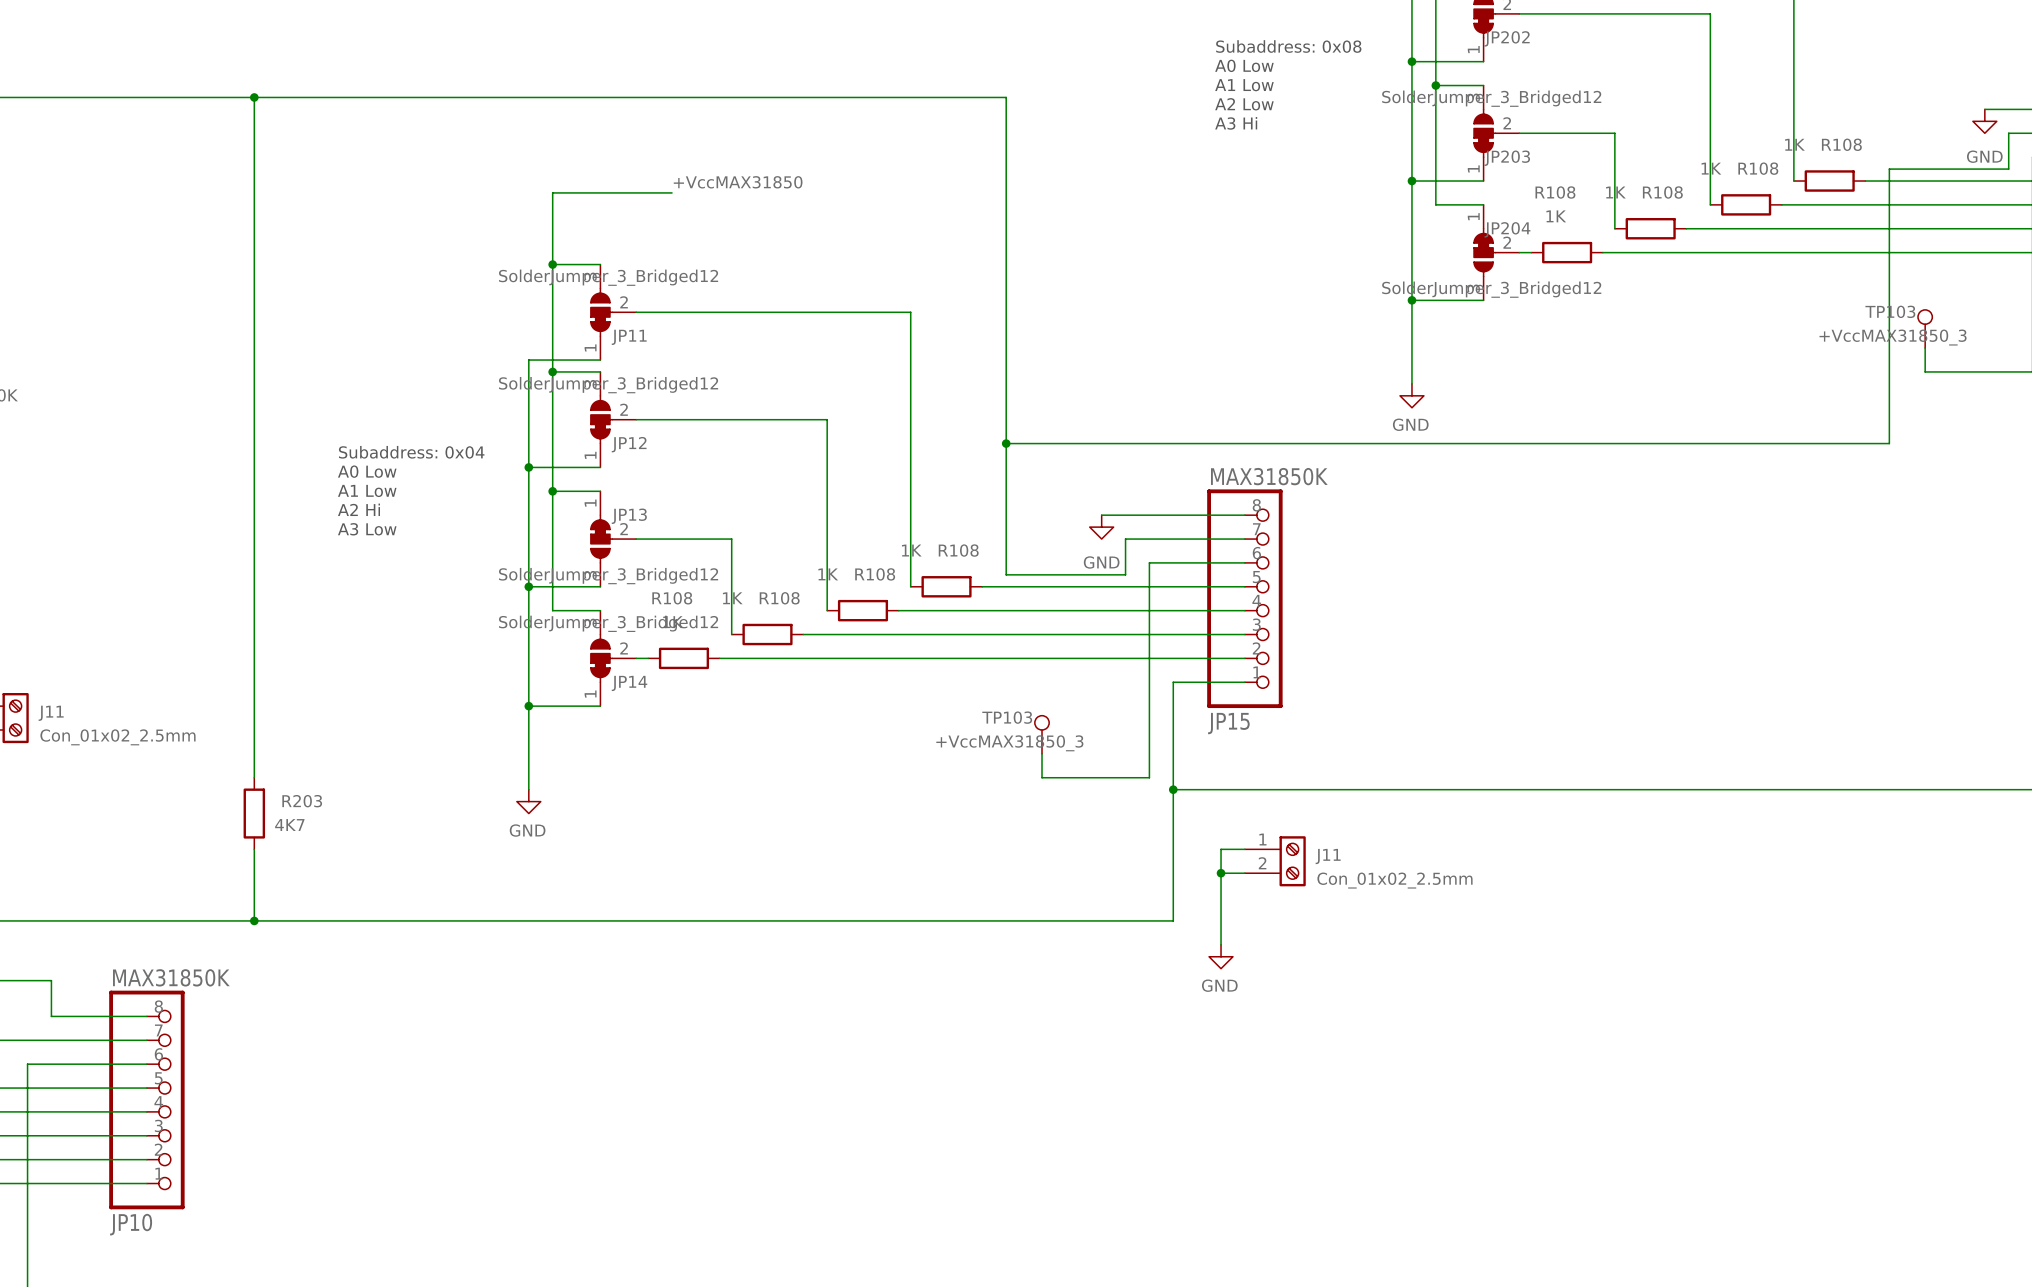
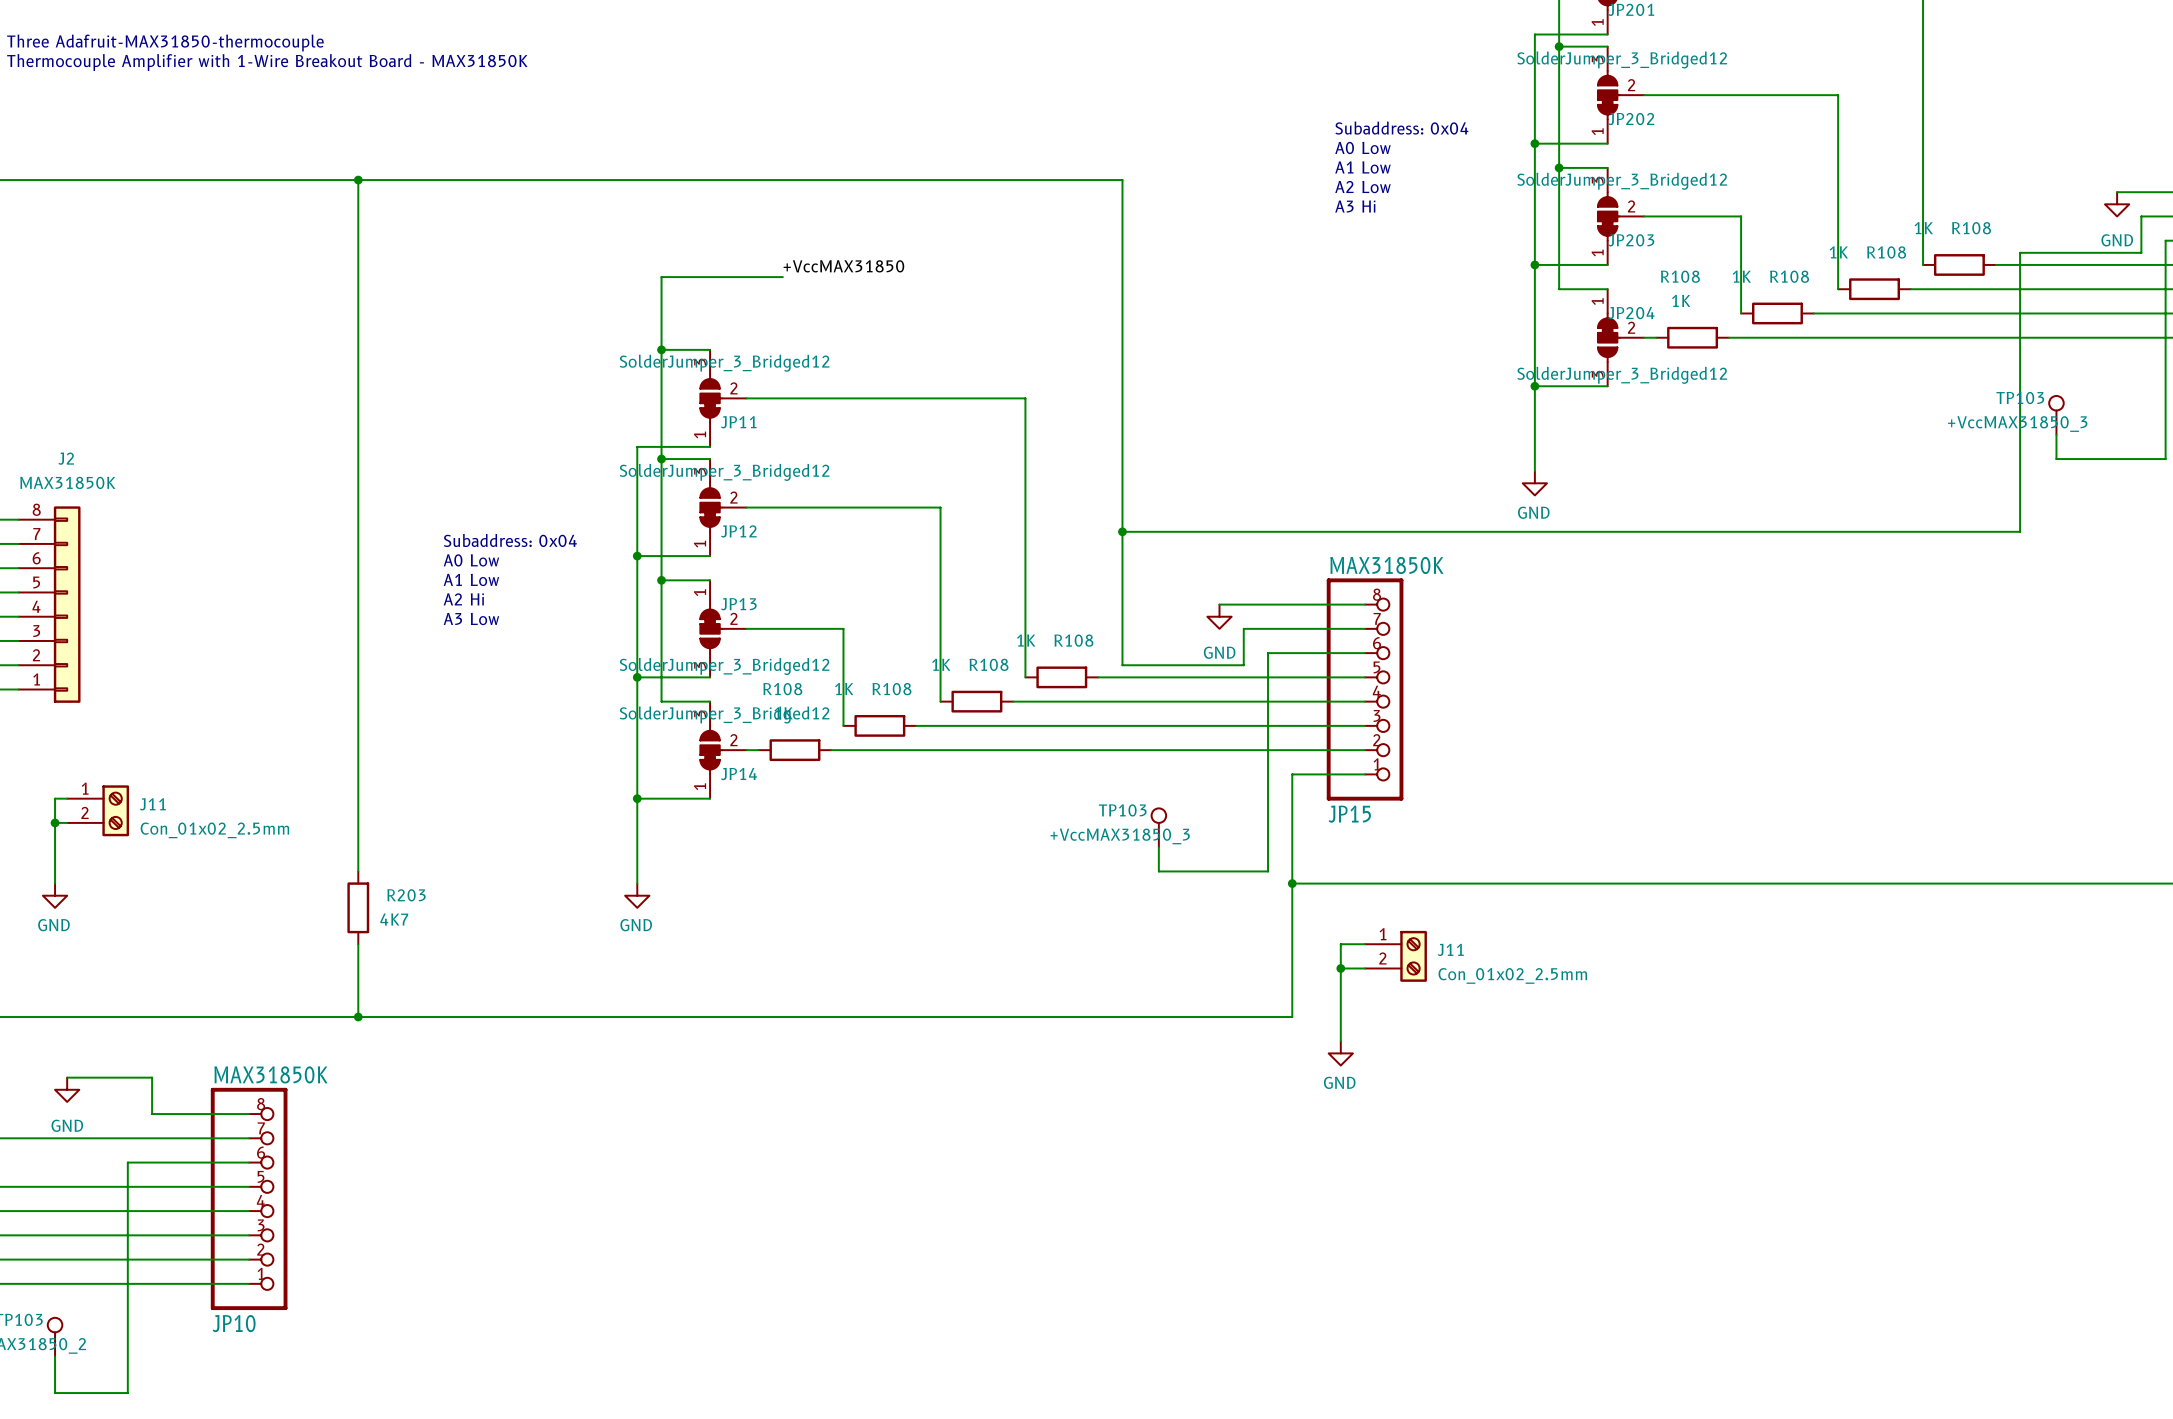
text: Subaddress: 0x08 (1288, 46) -> Subaddress: 0x04 (1401, 128)

